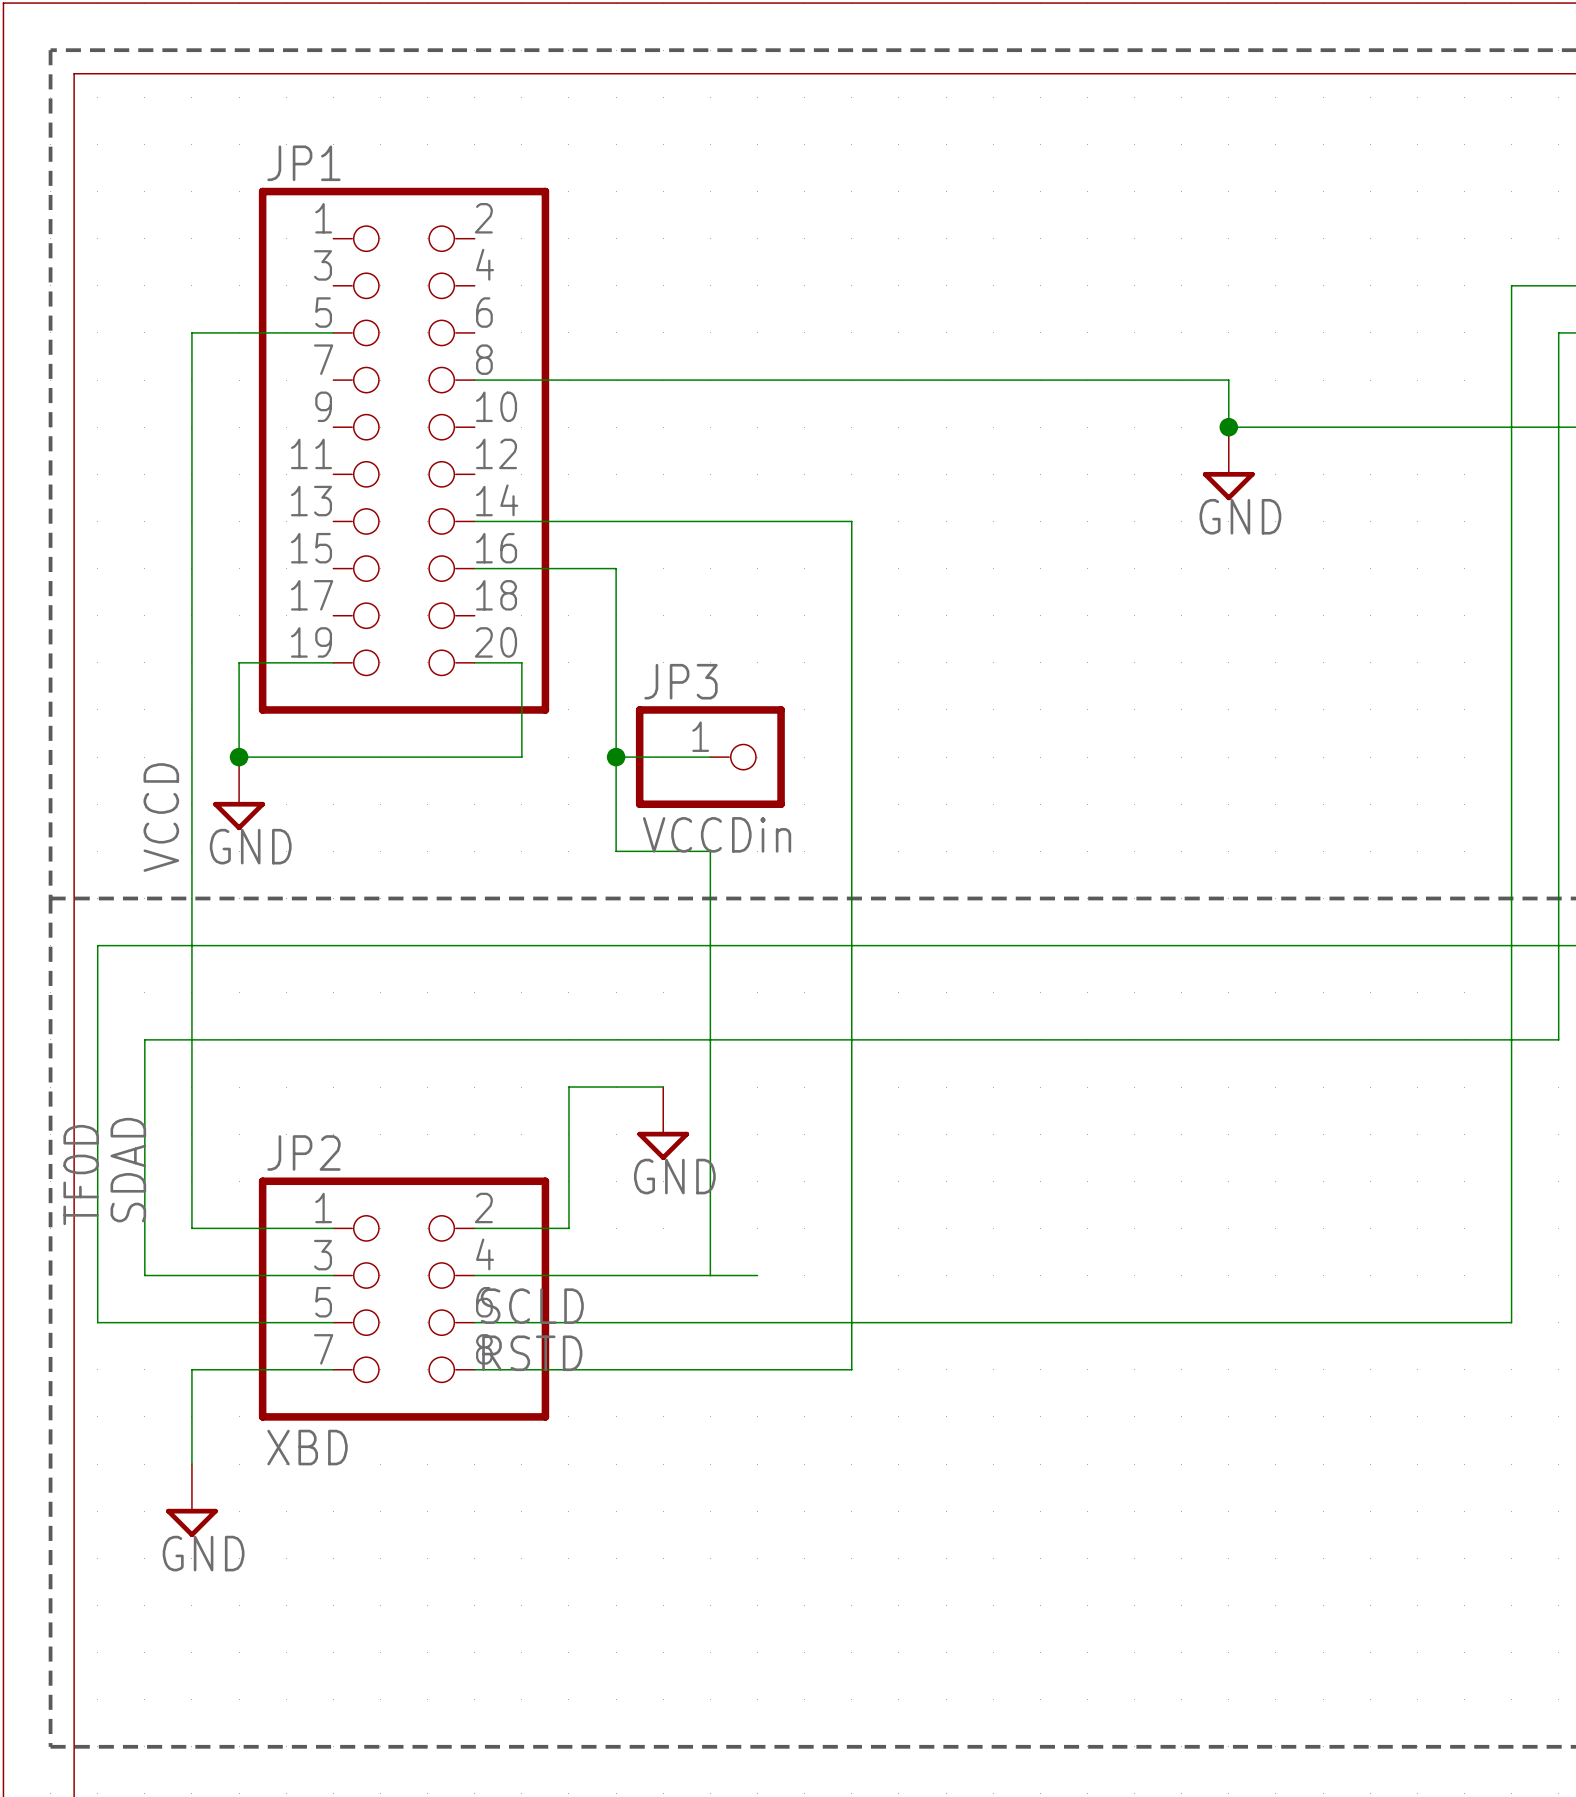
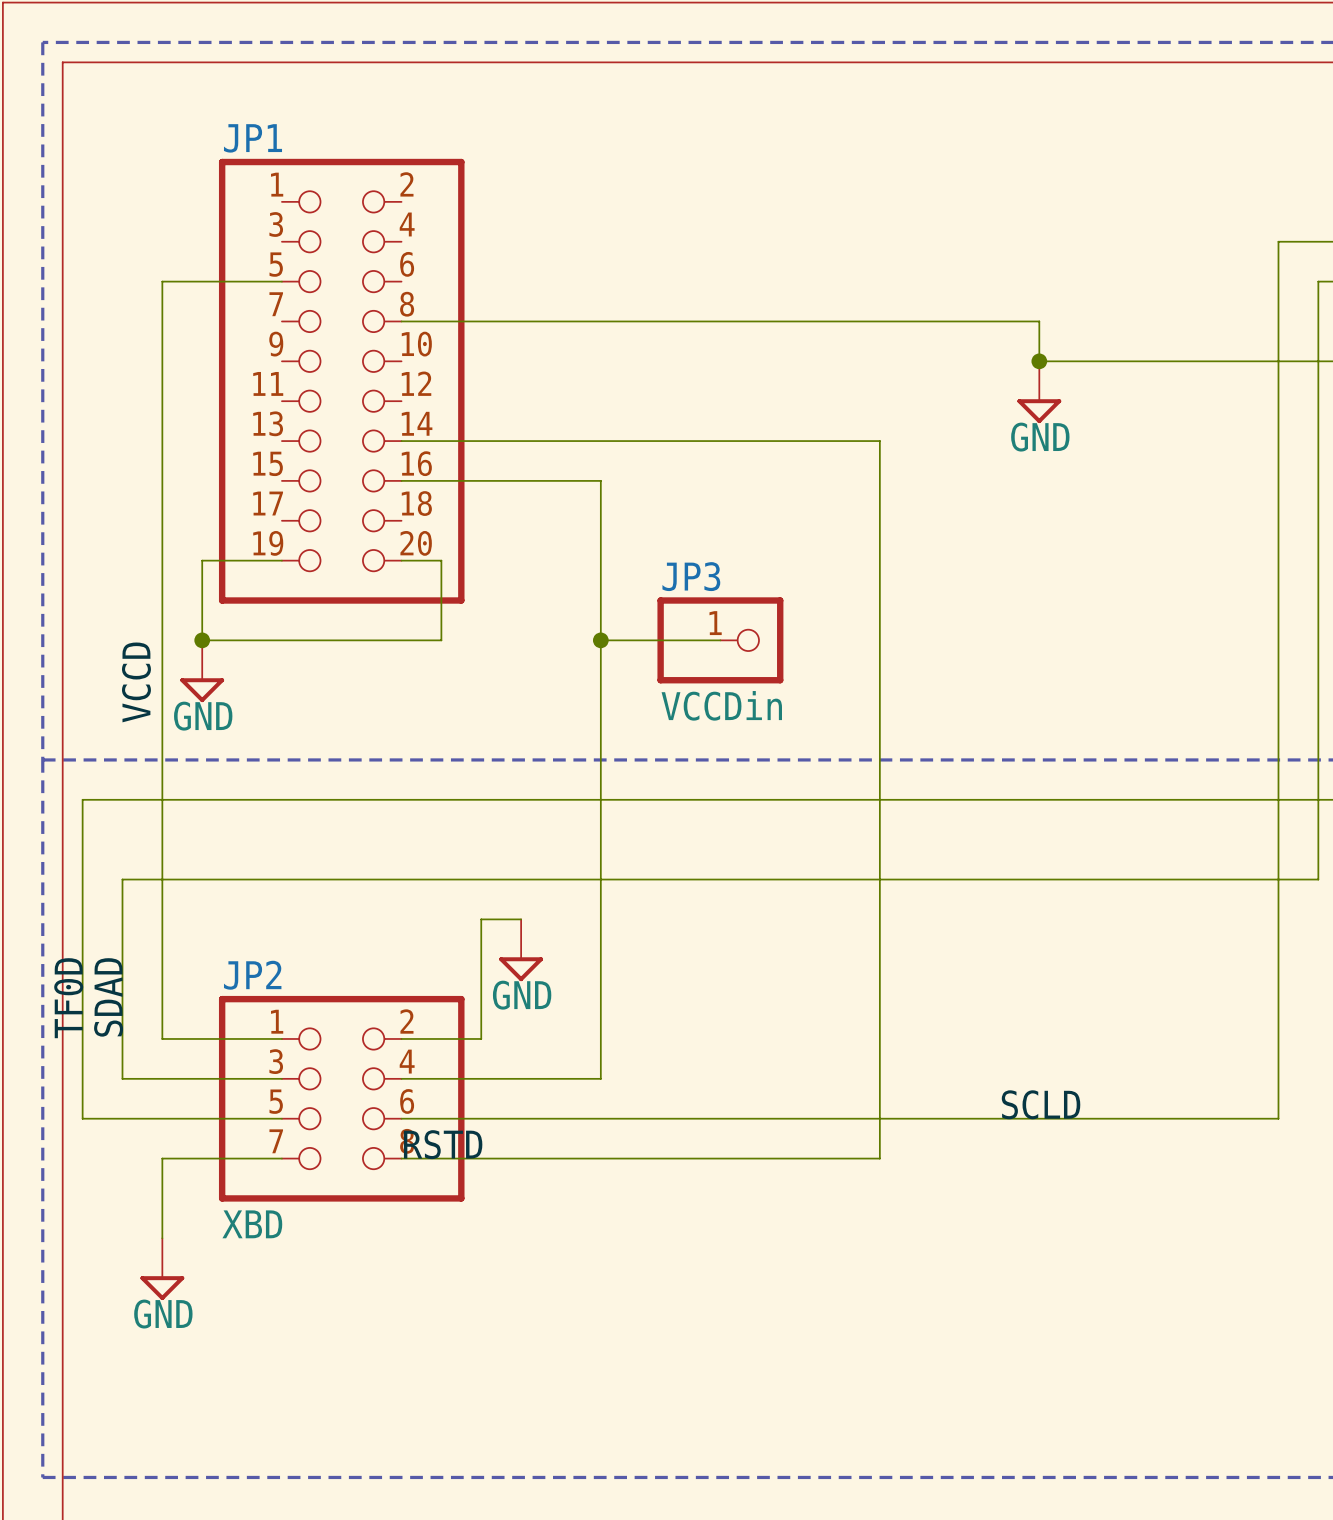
wire: (851, 521) (851, 1369) -> (720, 441) (879, 441) (879, 1158) (720, 1158)
wire: (616, 568) (616, 851) (710, 851) -> (521, 480) (600, 480) (600, 720)
wire: (616, 757) (710, 757) -> (720, 640) (600, 640)
junction position: (616, 757) -> (600, 640)
JP3 position: (710, 757) -> (720, 640)
wire: (616, 1087) (663, 1087) -> none
power symbol position: GND (663, 1123) -> GND (521, 950)
wire: (710, 1275) (757, 1275) -> none
label: SCLD (532, 1306) -> none
label: none -> SCLD (1041, 1104)

